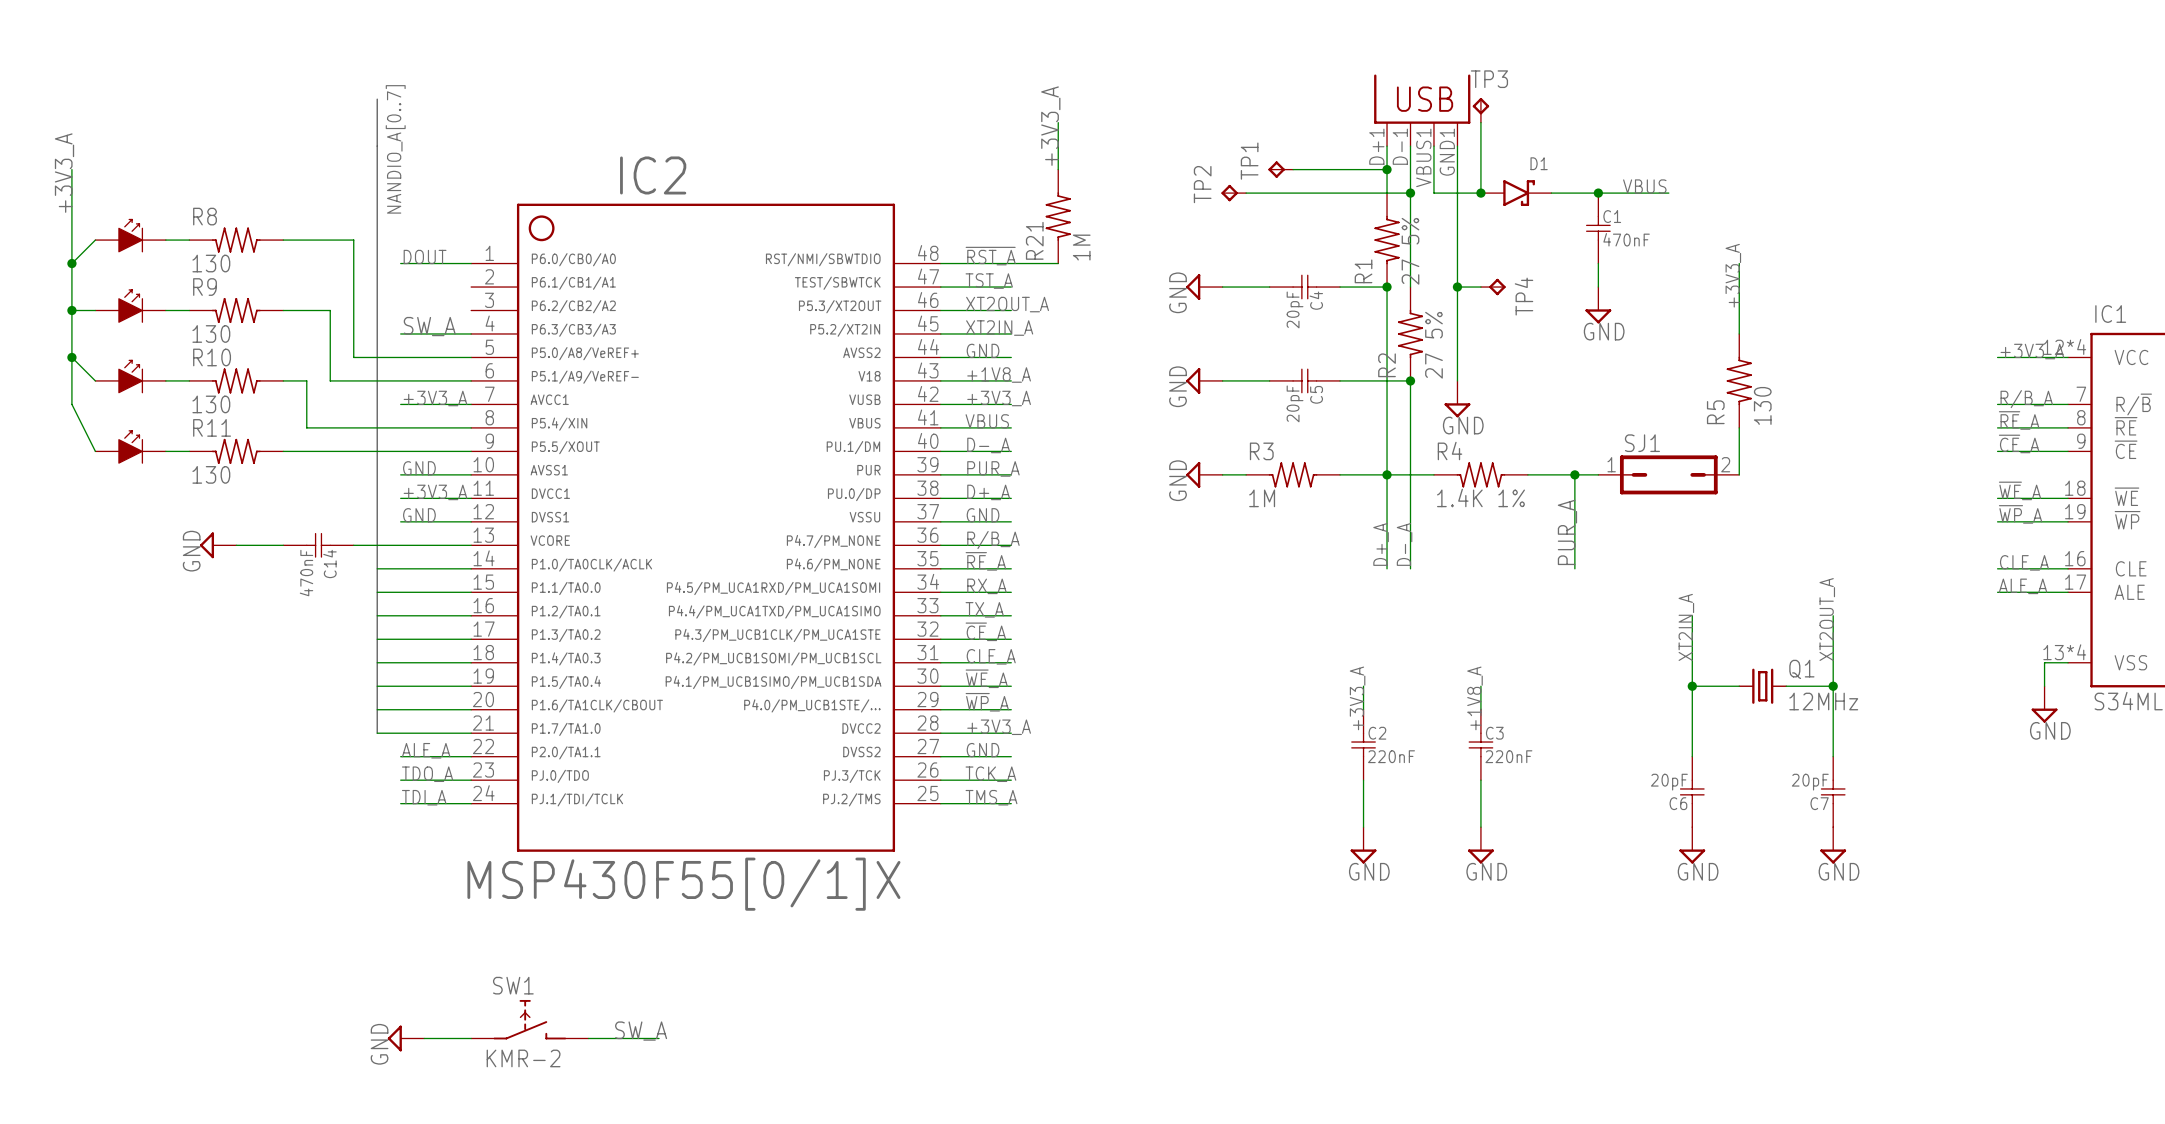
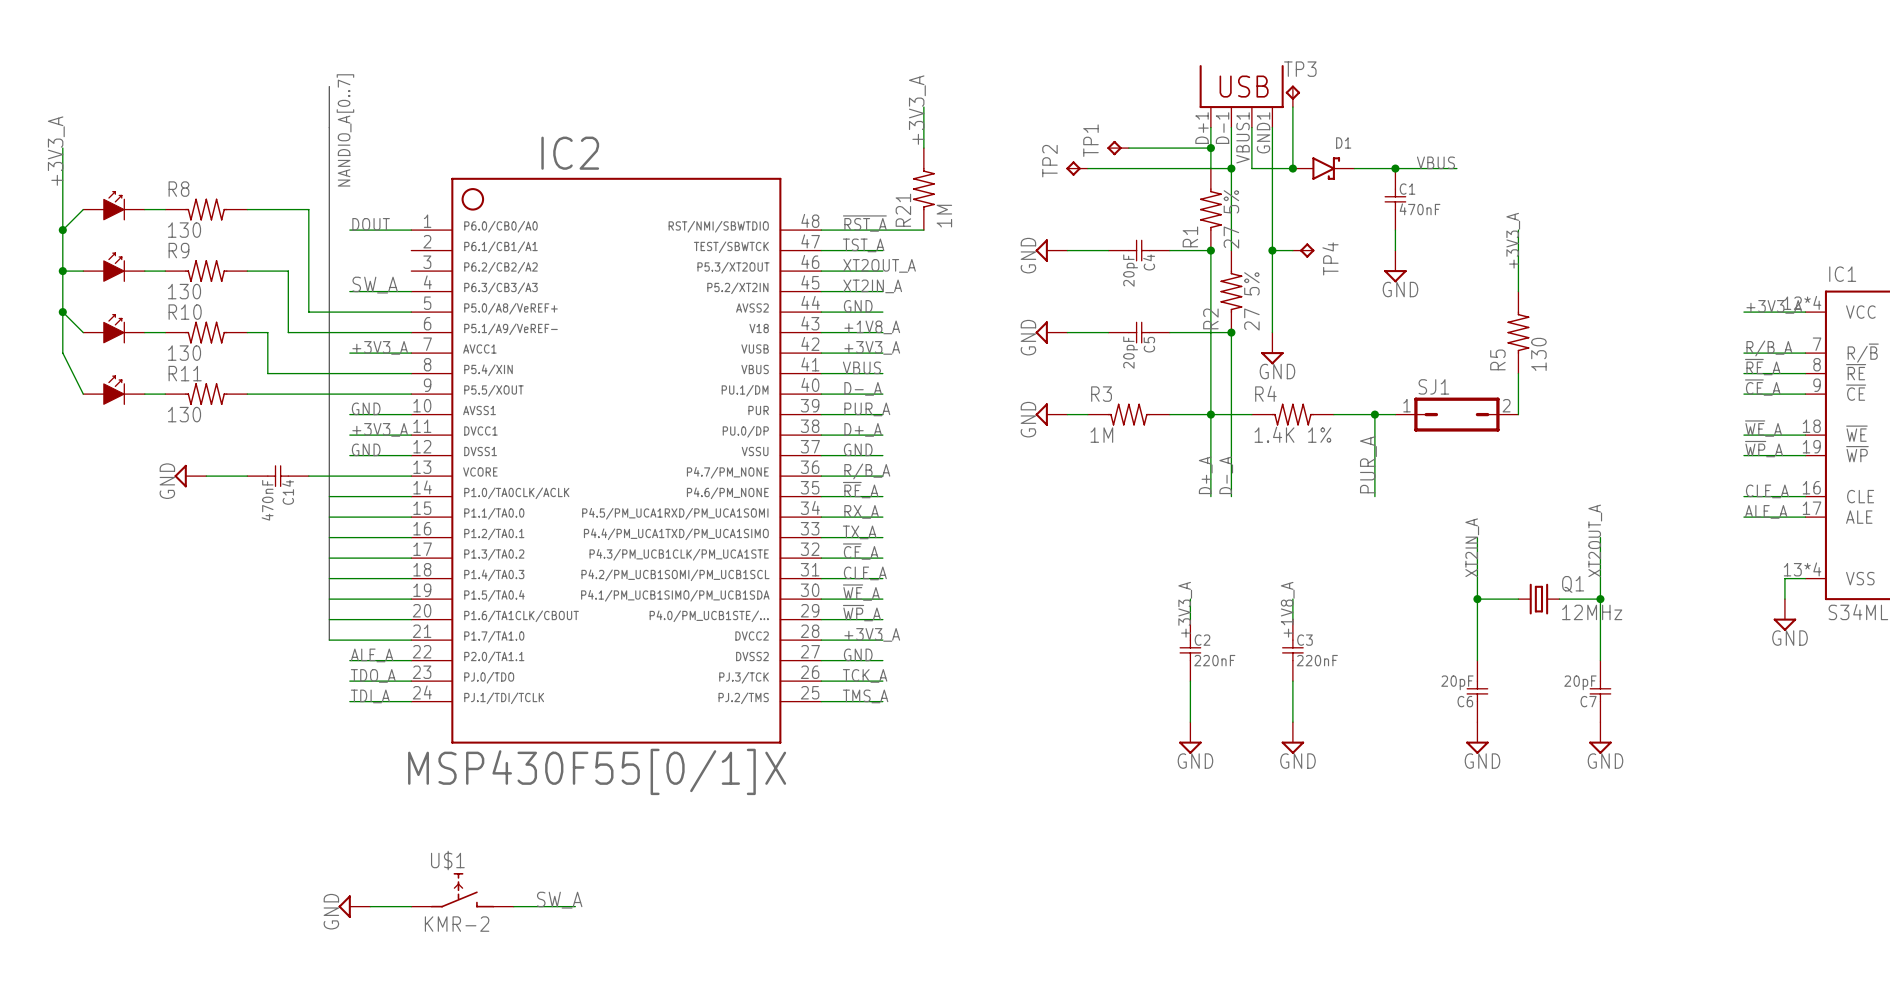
SW1 name: SW1 (513, 985) -> U$1 (447, 860)

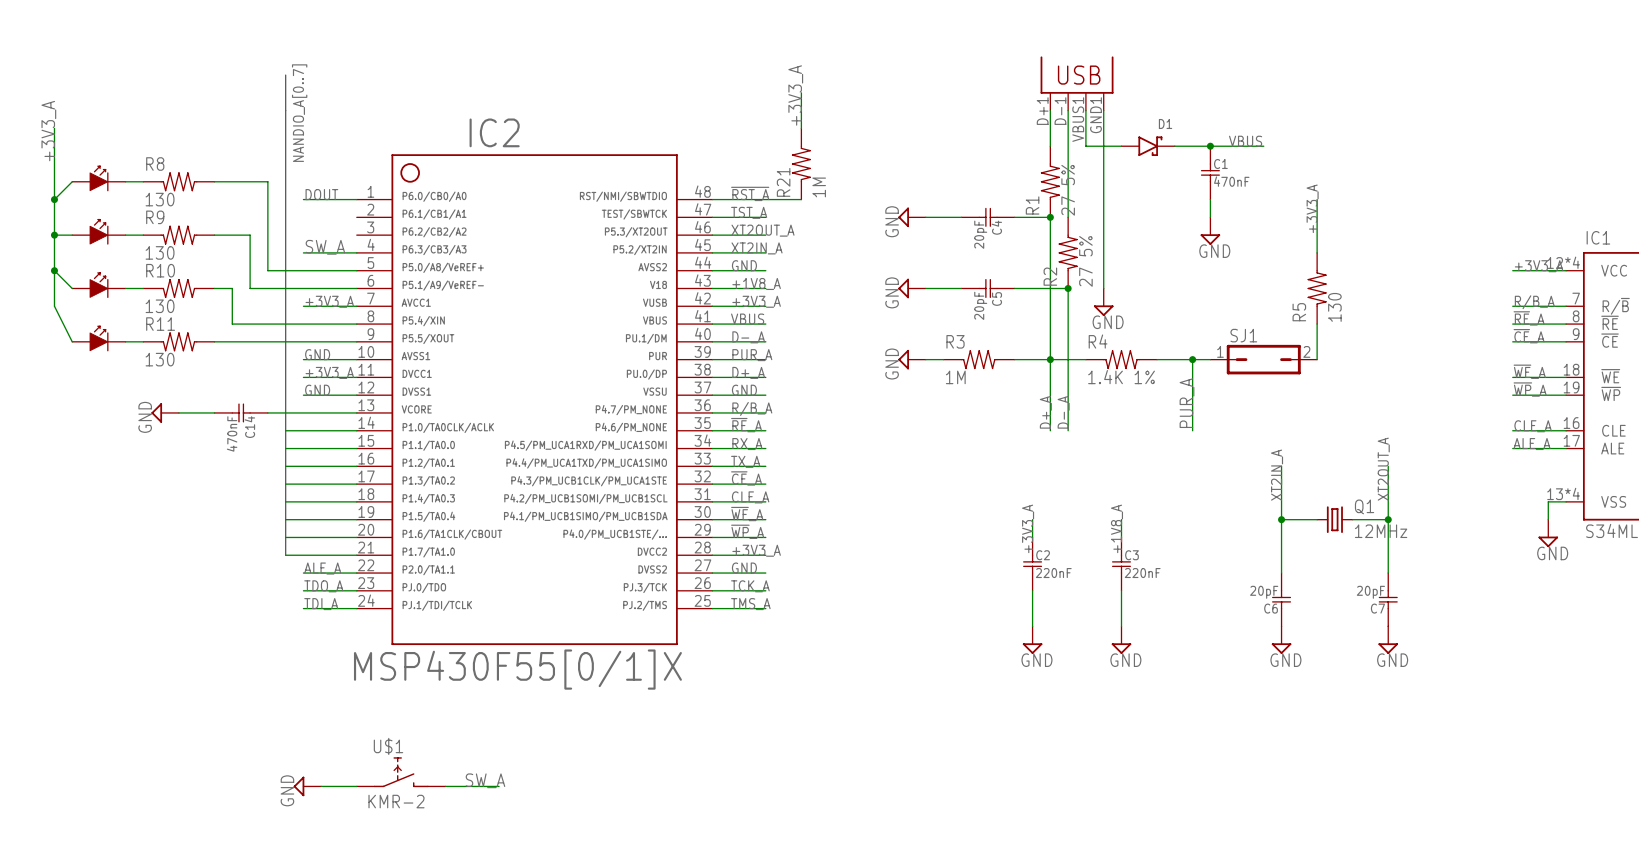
TP3: (1292, 96) -> none
wire: (1292, 107) (1292, 168) -> none
TP1: (1118, 148) -> none
wire: (1128, 148) (1210, 148) -> none
junction: (1210, 148) -> none
TP2: (1077, 168) -> none
wire: (1087, 168) (1231, 168) -> none
junction: (1231, 168) -> none
junction: (1292, 168) -> none
wire: (1272, 250) (1292, 250) -> none
junction: (1272, 250) -> none
TP4: (1303, 250) -> none

